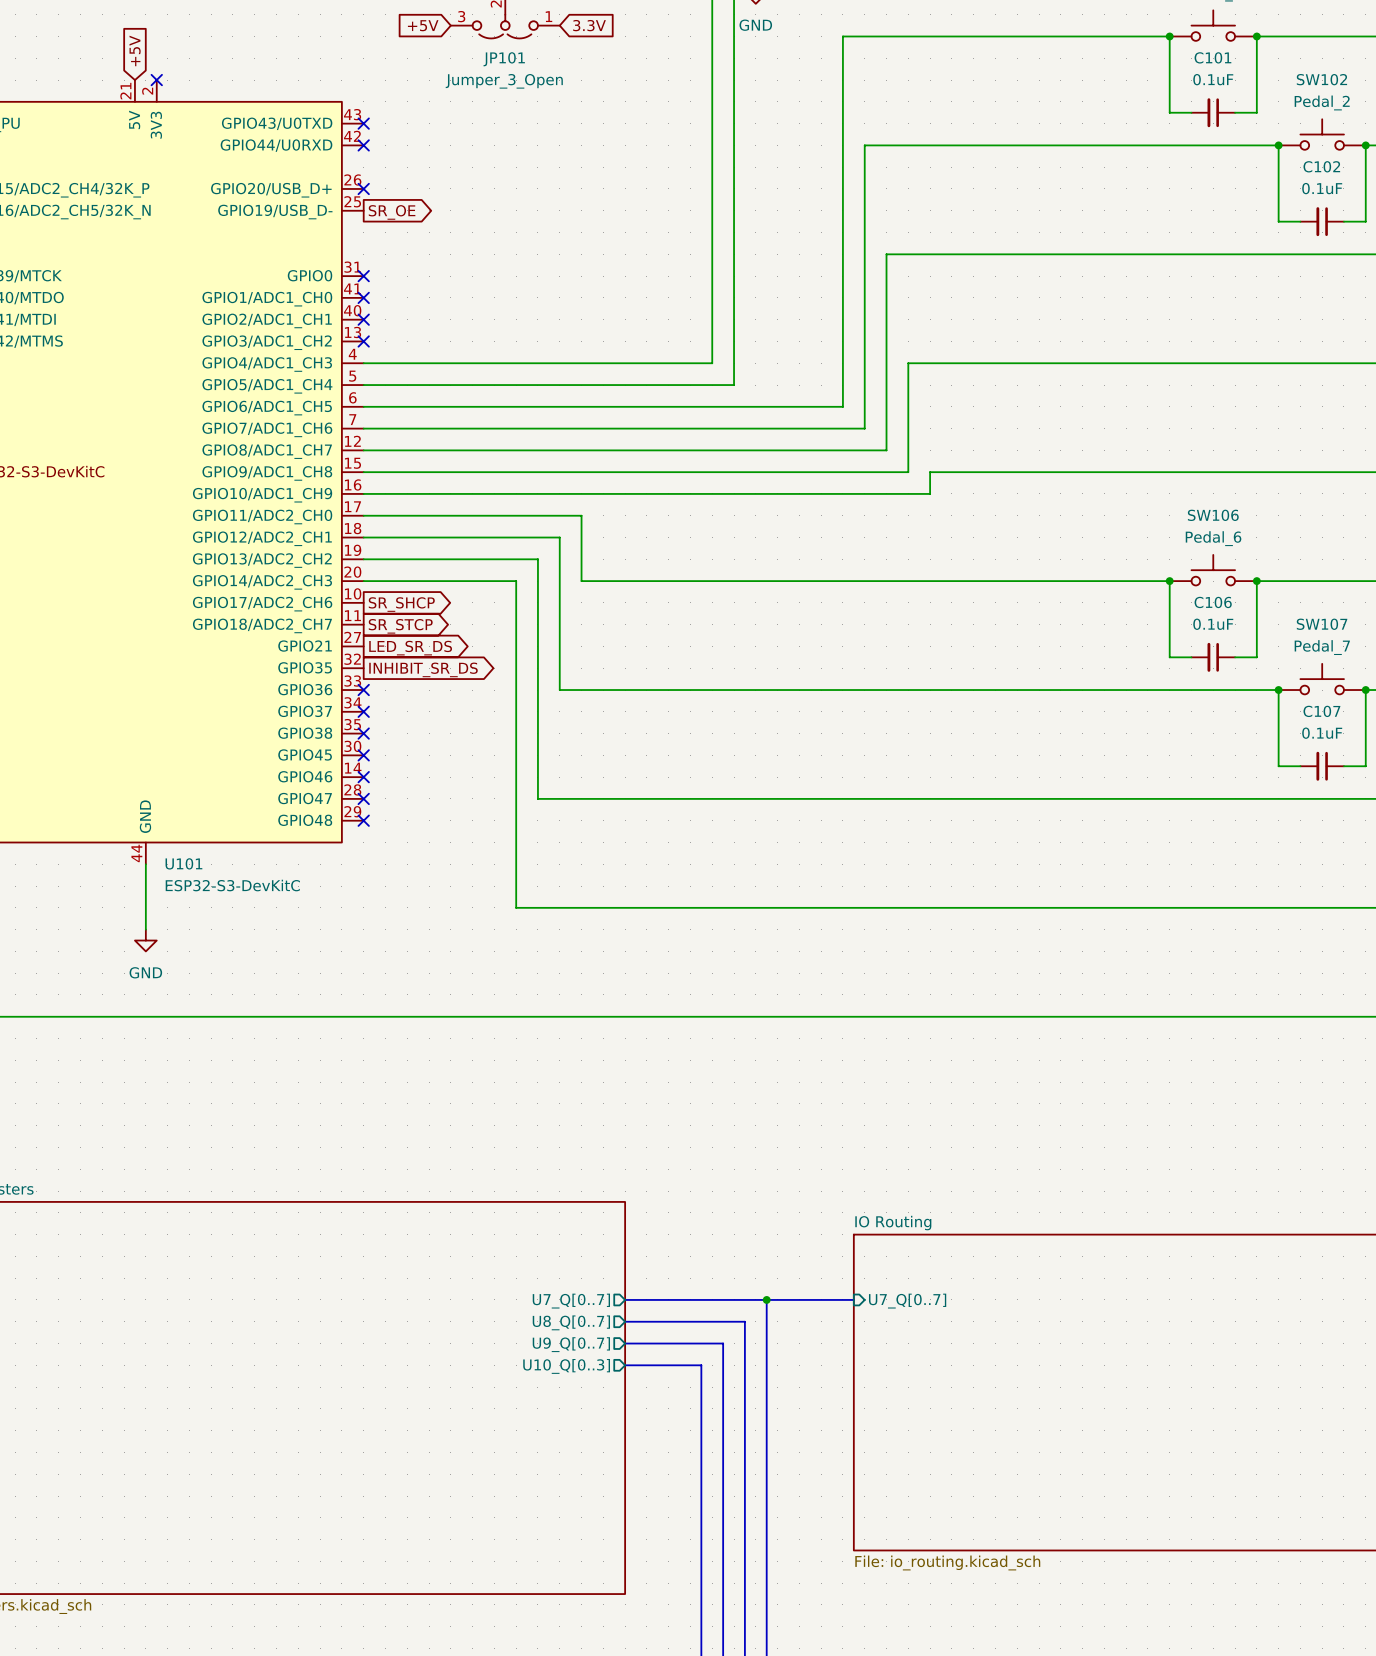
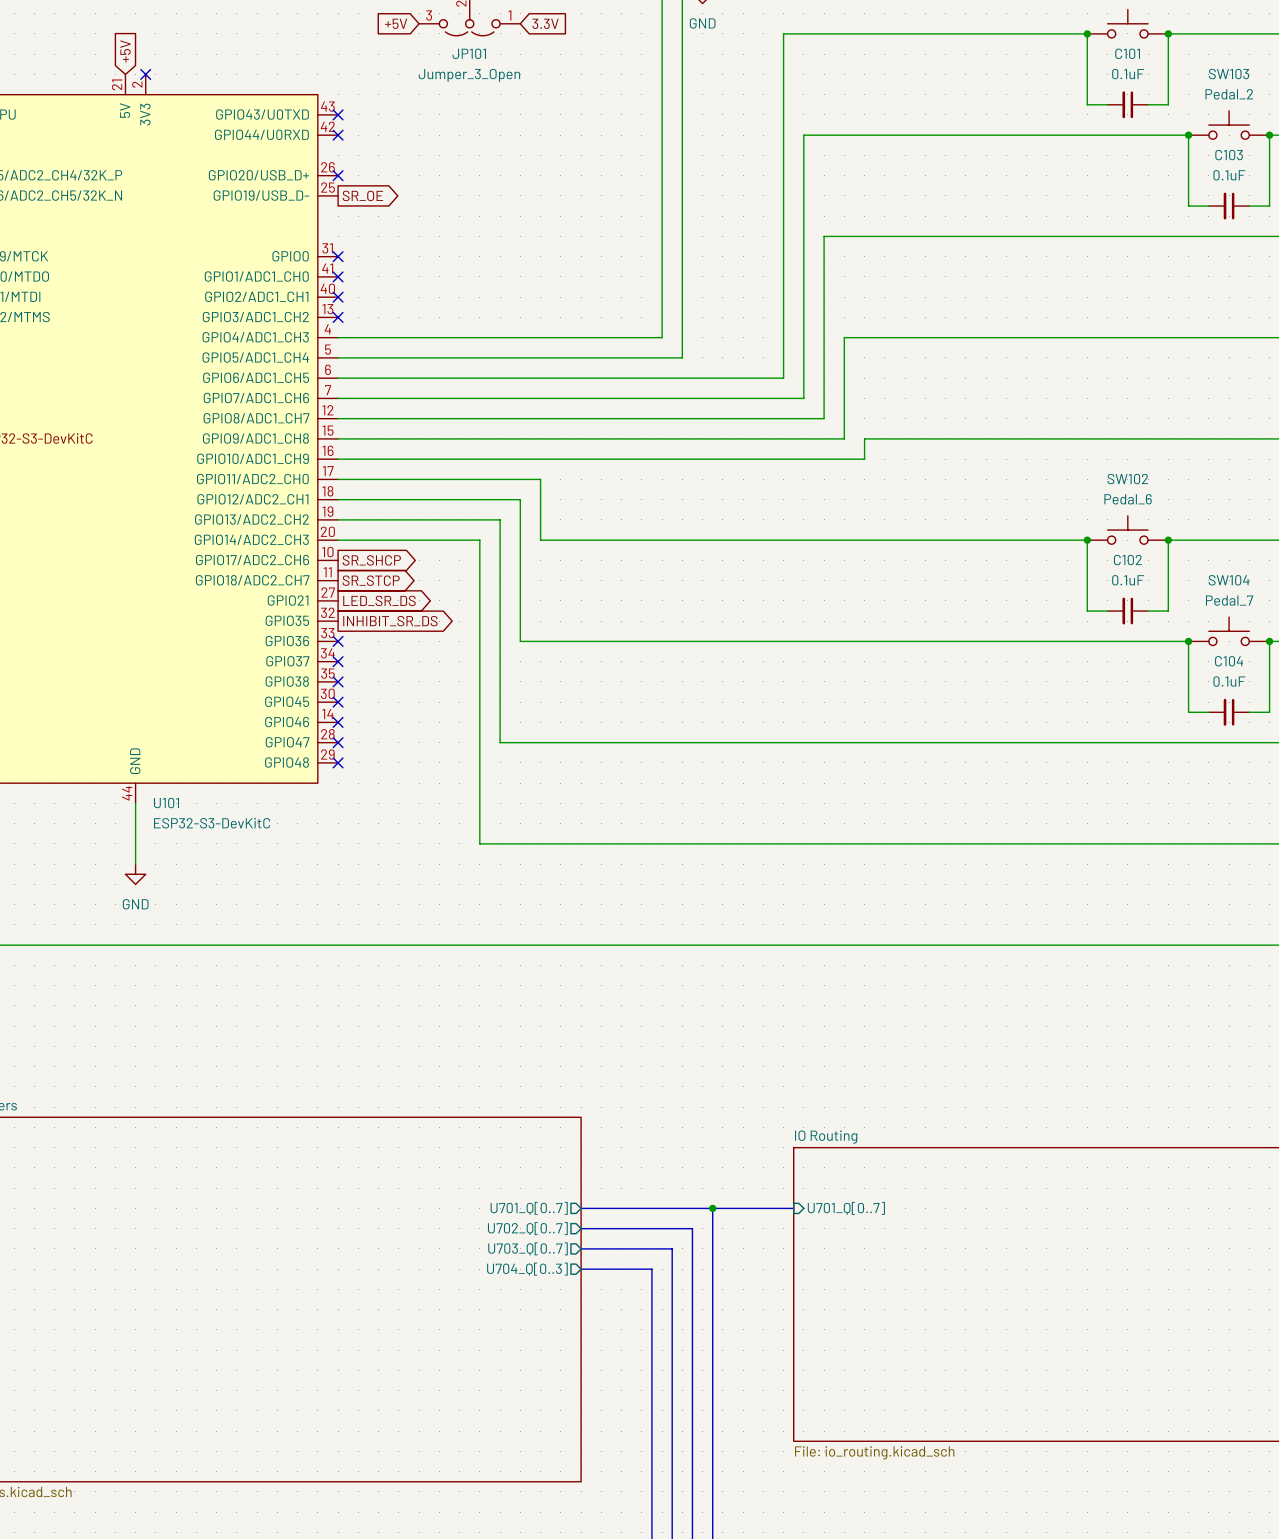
SW102 name: SW102 (1321, 79) -> SW103 (1228, 74)
C102 name: C102 (1321, 166) -> C103 (1229, 155)
SW106 name: SW106 (1213, 515) -> SW102 (1127, 479)
C106 name: C106 (1213, 602) -> C102 (1127, 560)
SW107 name: SW107 (1322, 624) -> SW104 (1229, 580)
C107 name: C107 (1321, 711) -> C104 (1229, 661)
sheet pin: U7_Q[0..7] (571, 1301) -> U701_Q[0..7] (529, 1208)
sheet pin: U7_Q[0..7] (907, 1301) -> U701_Q[0..7] (846, 1208)
sheet pin: U8_Q[0..7] (571, 1322) -> U702_Q[0..7] (527, 1228)
sheet pin: U9_Q[0..7] (571, 1344) -> U703_Q[0..7] (528, 1248)
sheet pin: U10_Q[0..3] (566, 1366) -> U704_Q[0..3] (527, 1269)

